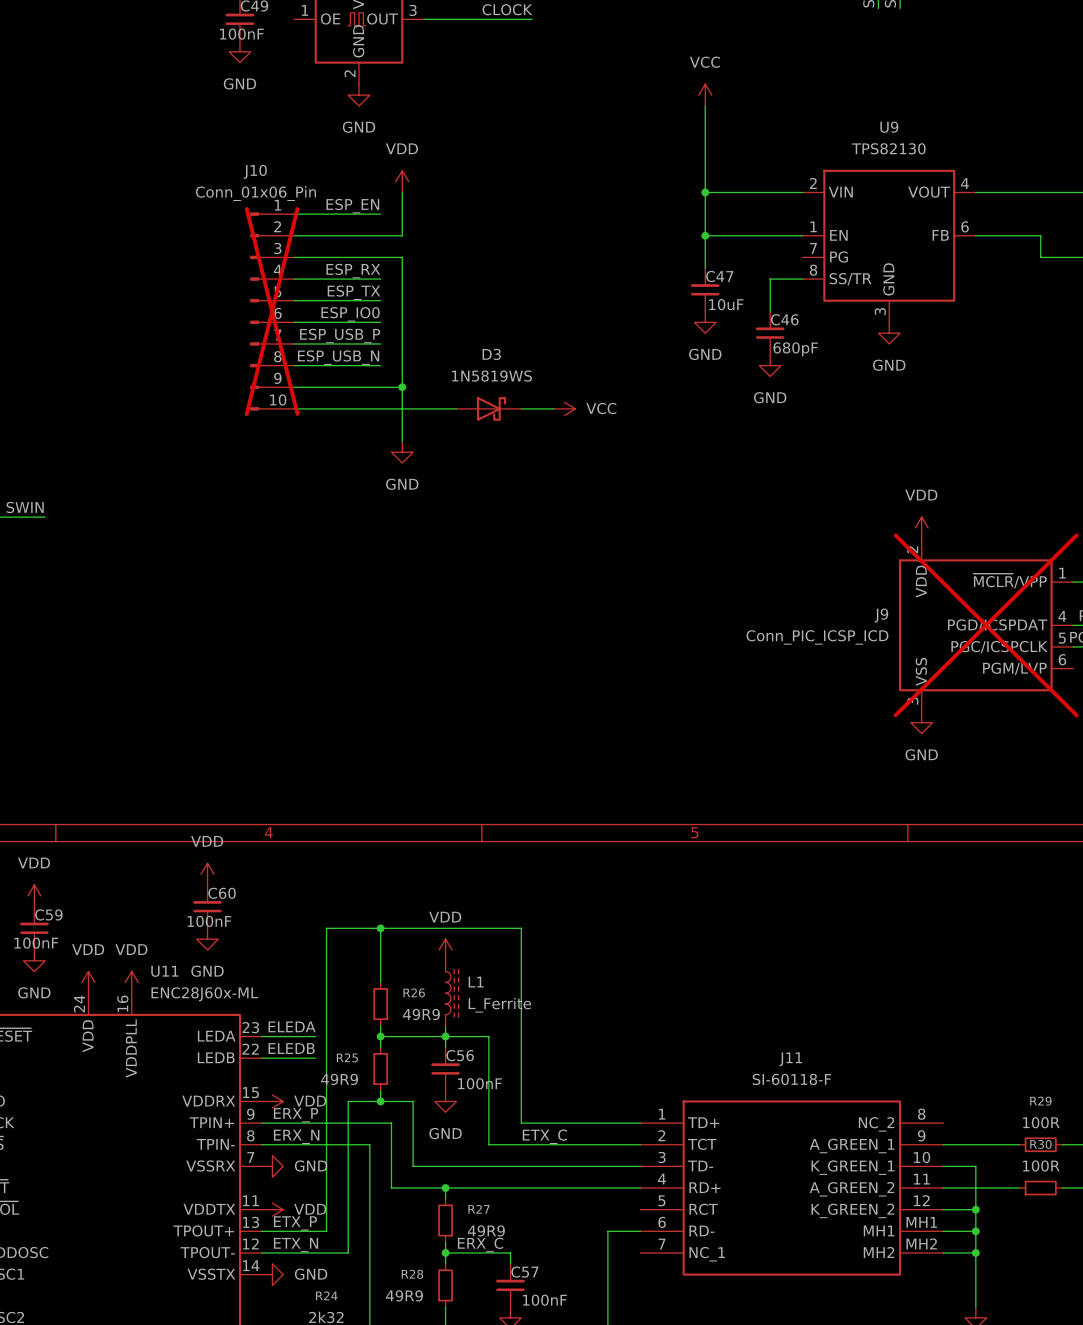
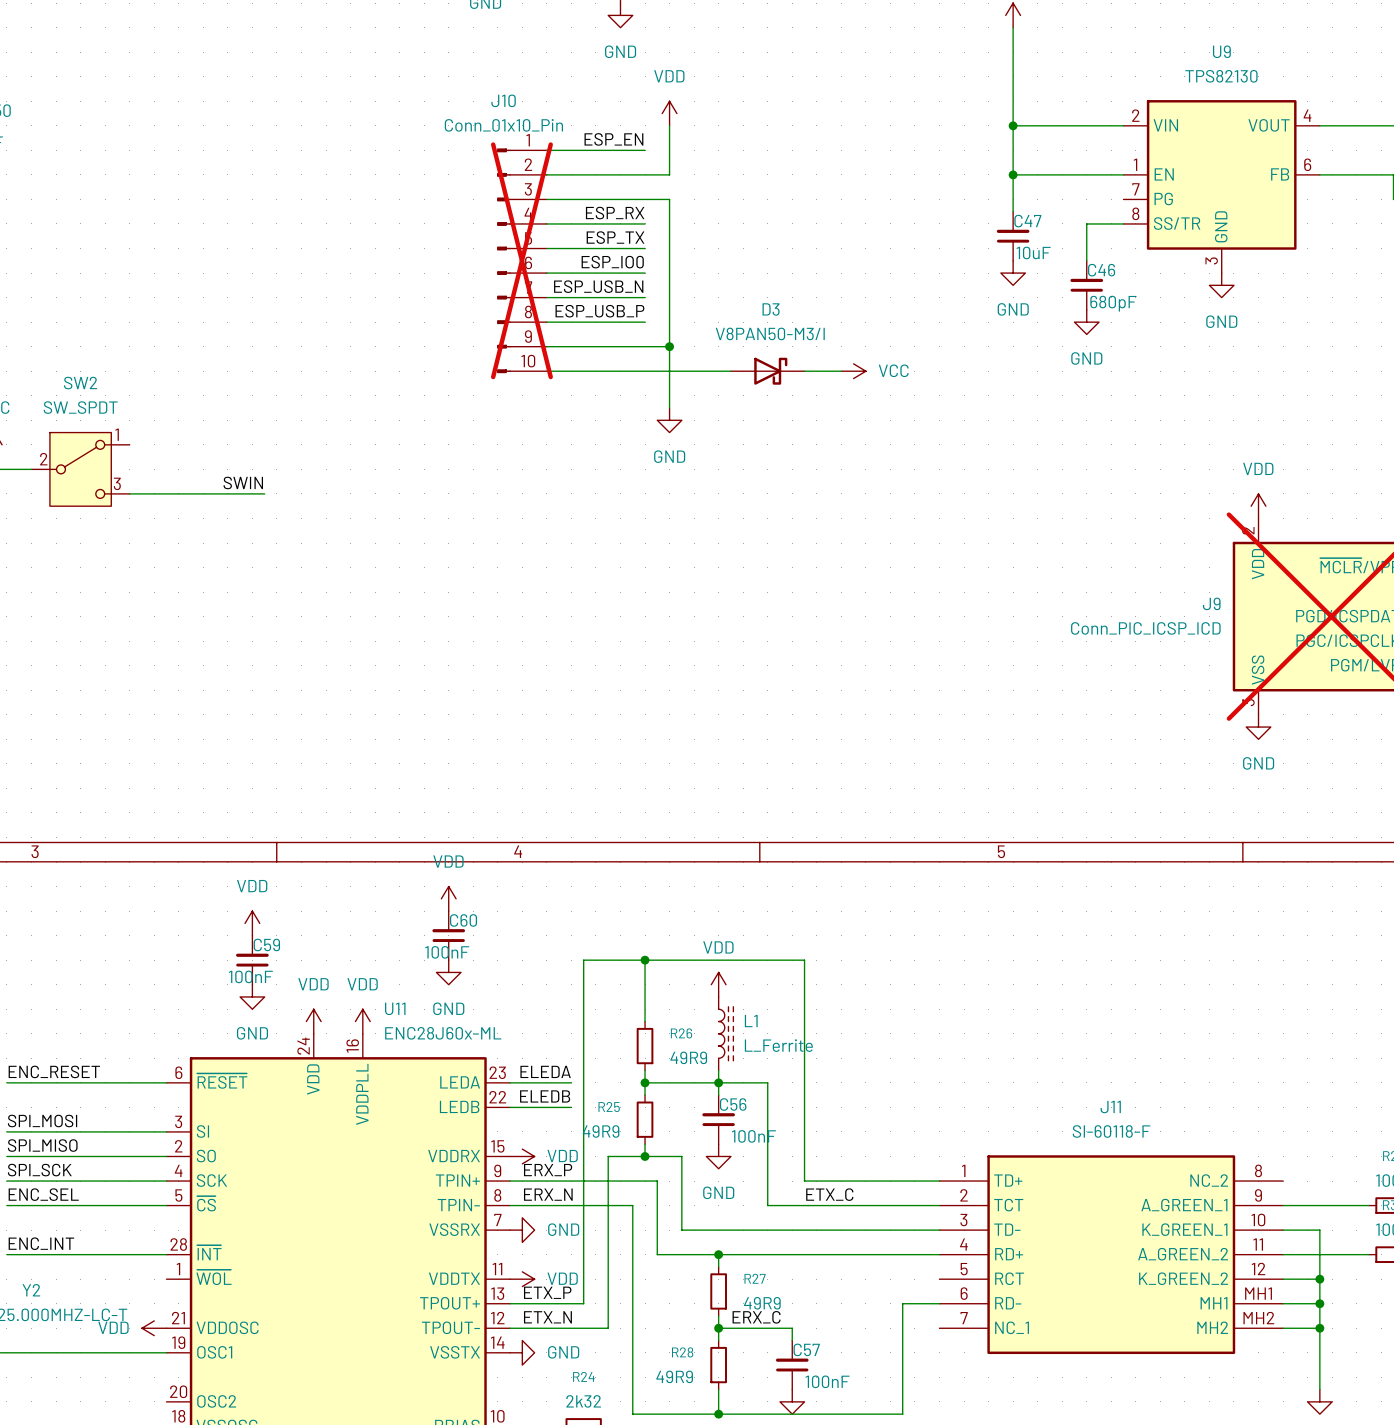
J10 value: Conn_01x06_Pin (256, 193) -> Conn_01x10_Pin (503, 125)
label: ESP_USB_P (340, 335) -> ESP_USB_N (598, 286)
label: ESP_USB_N (338, 357) -> ESP_USB_P (599, 311)
D3 value: 1N5819WS (491, 376) -> V8PAN50-M3/I (770, 333)

